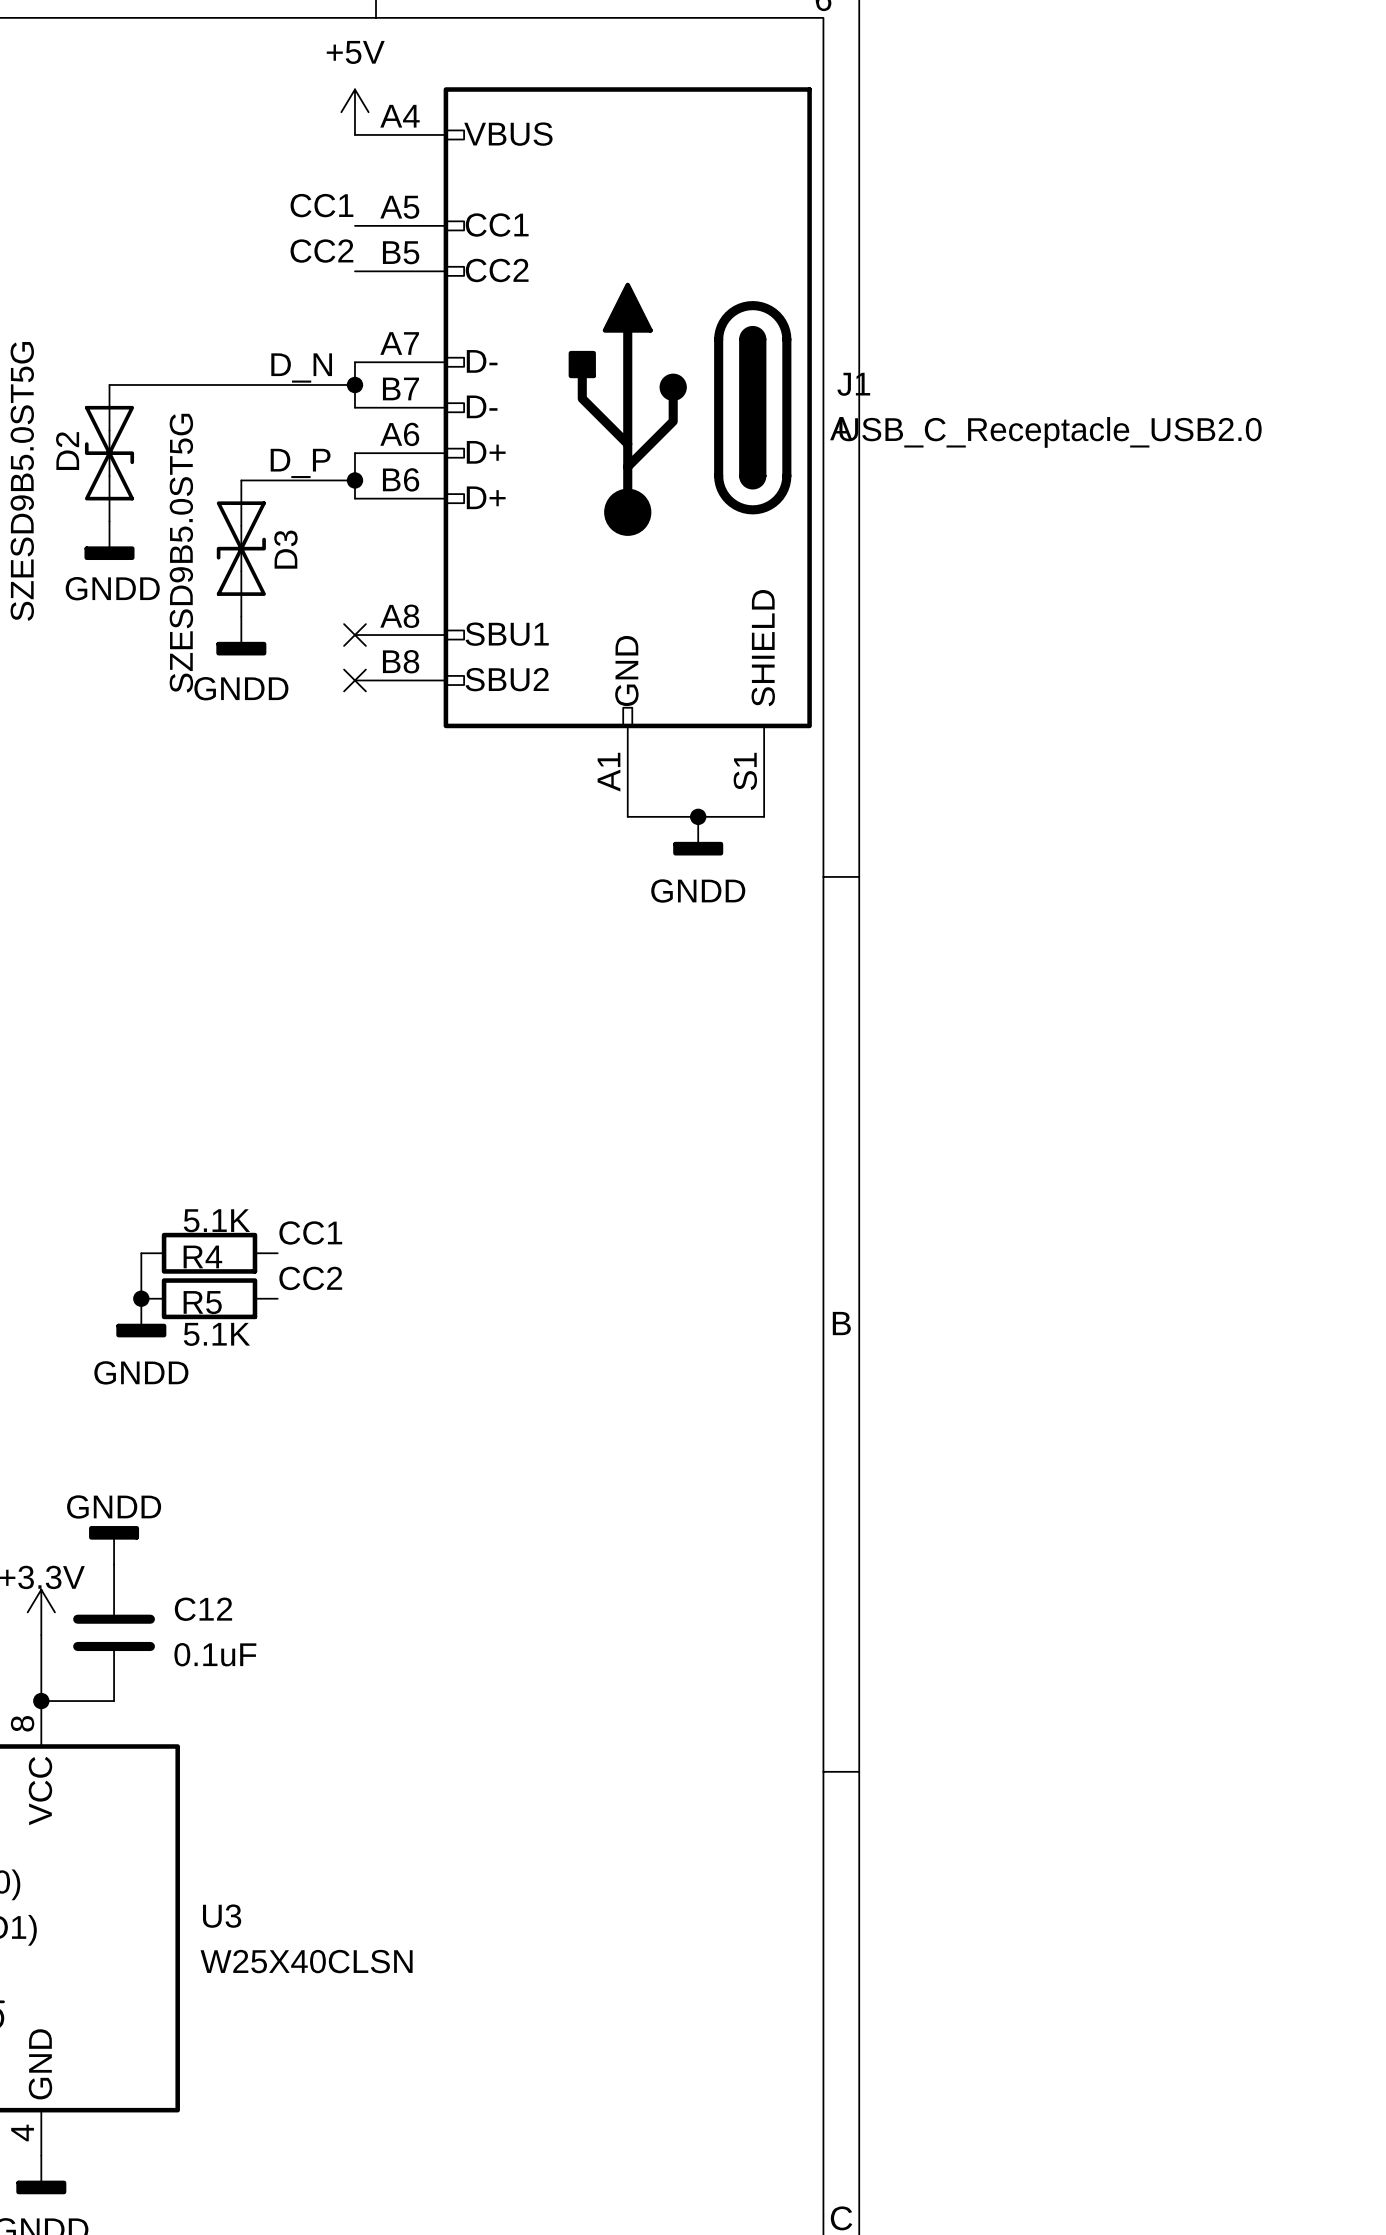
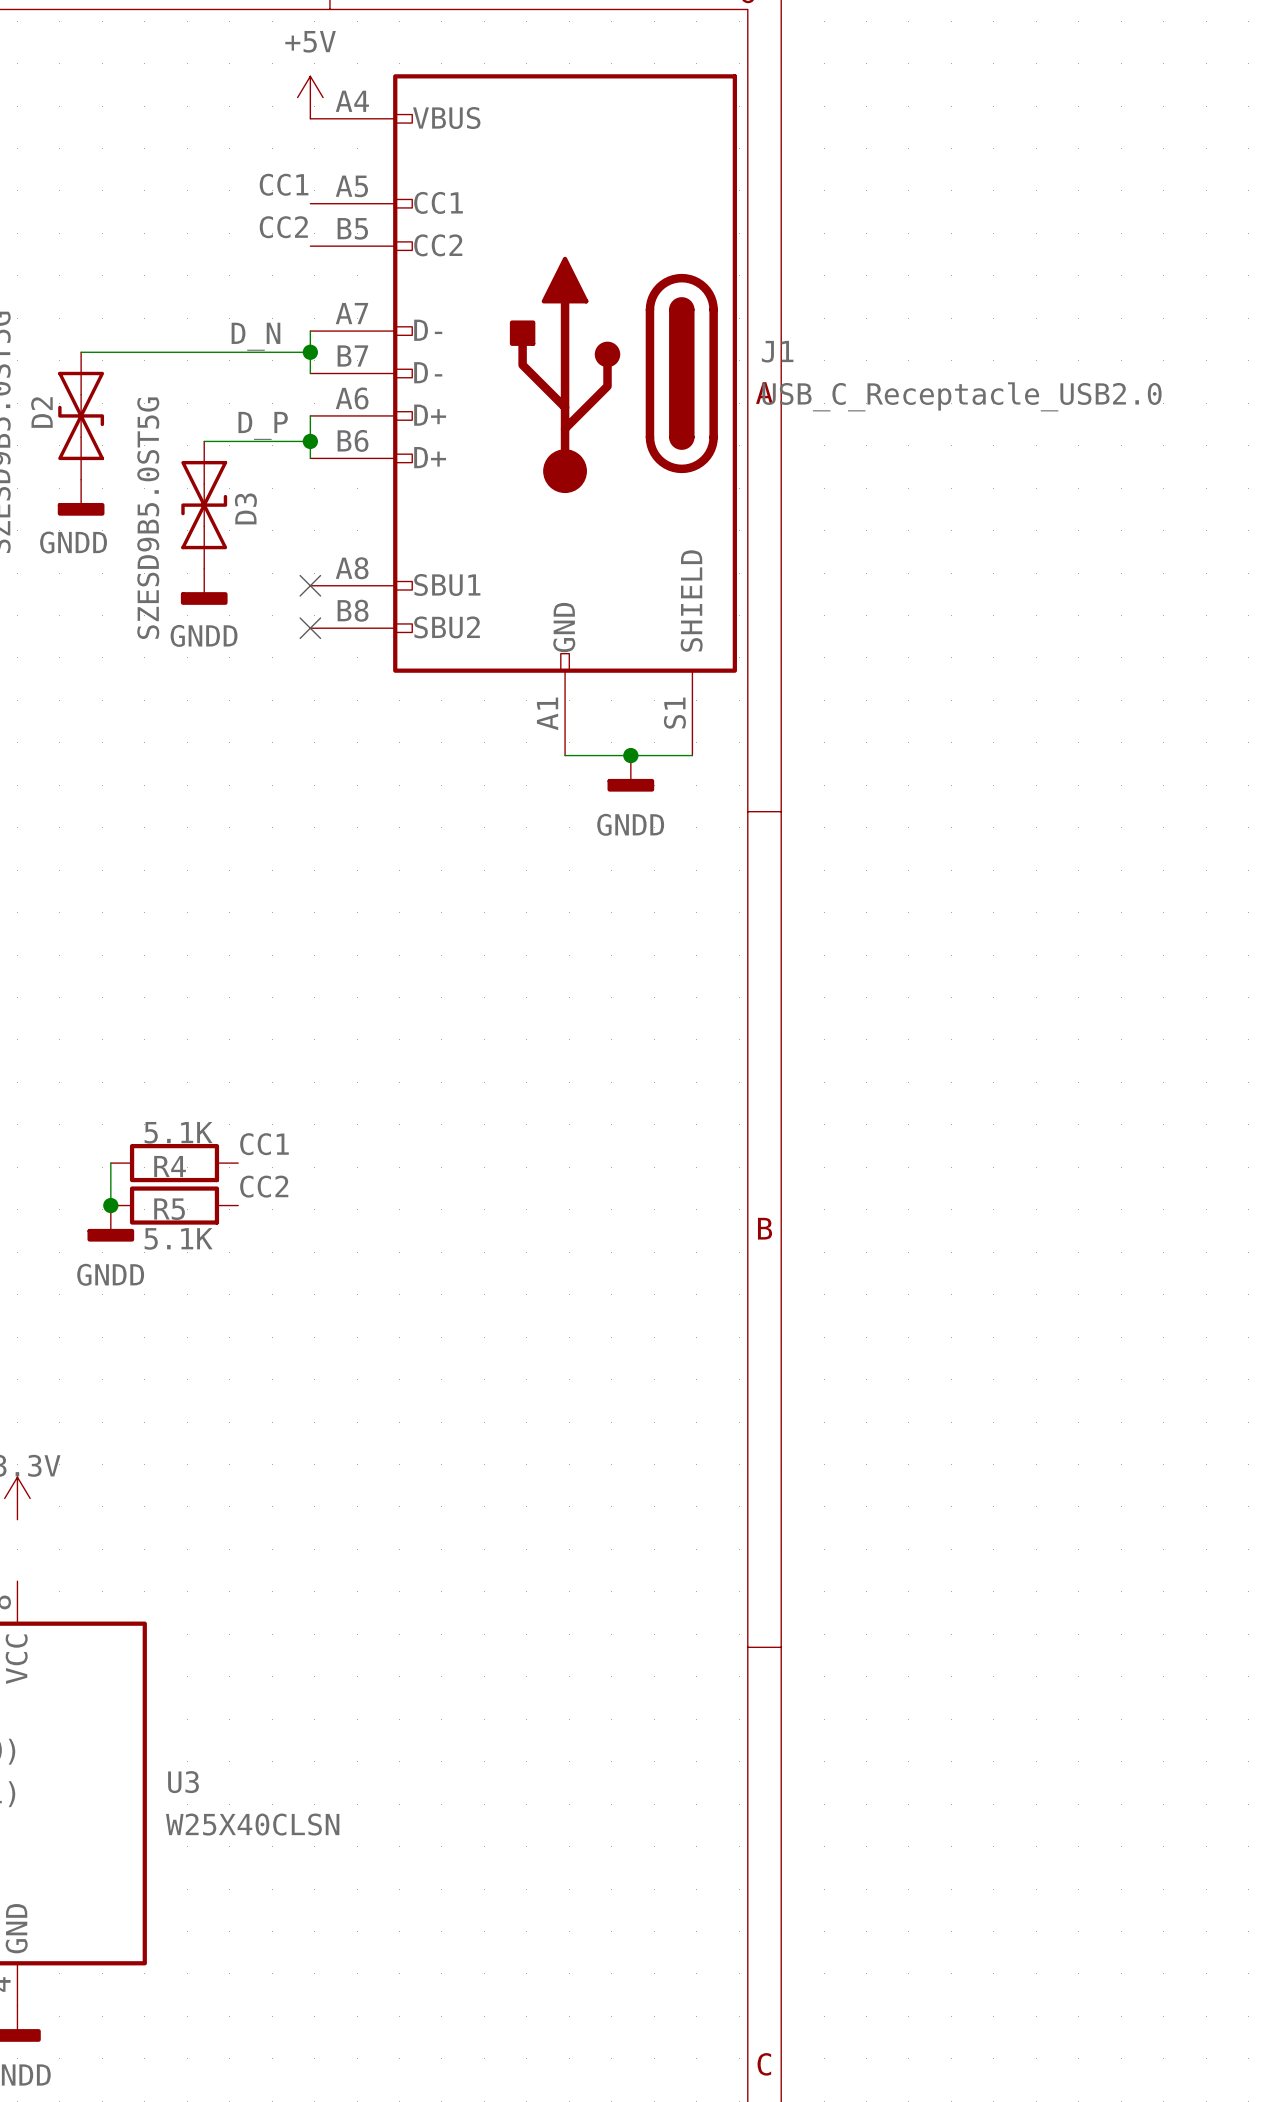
power symbol: GNDD (114, 1545) -> none
C12: 0.1uF (114, 1632) -> none
wire: (41, 1635) (41, 1701) (114, 1701) -> none
junction: (41, 1701) -> none

